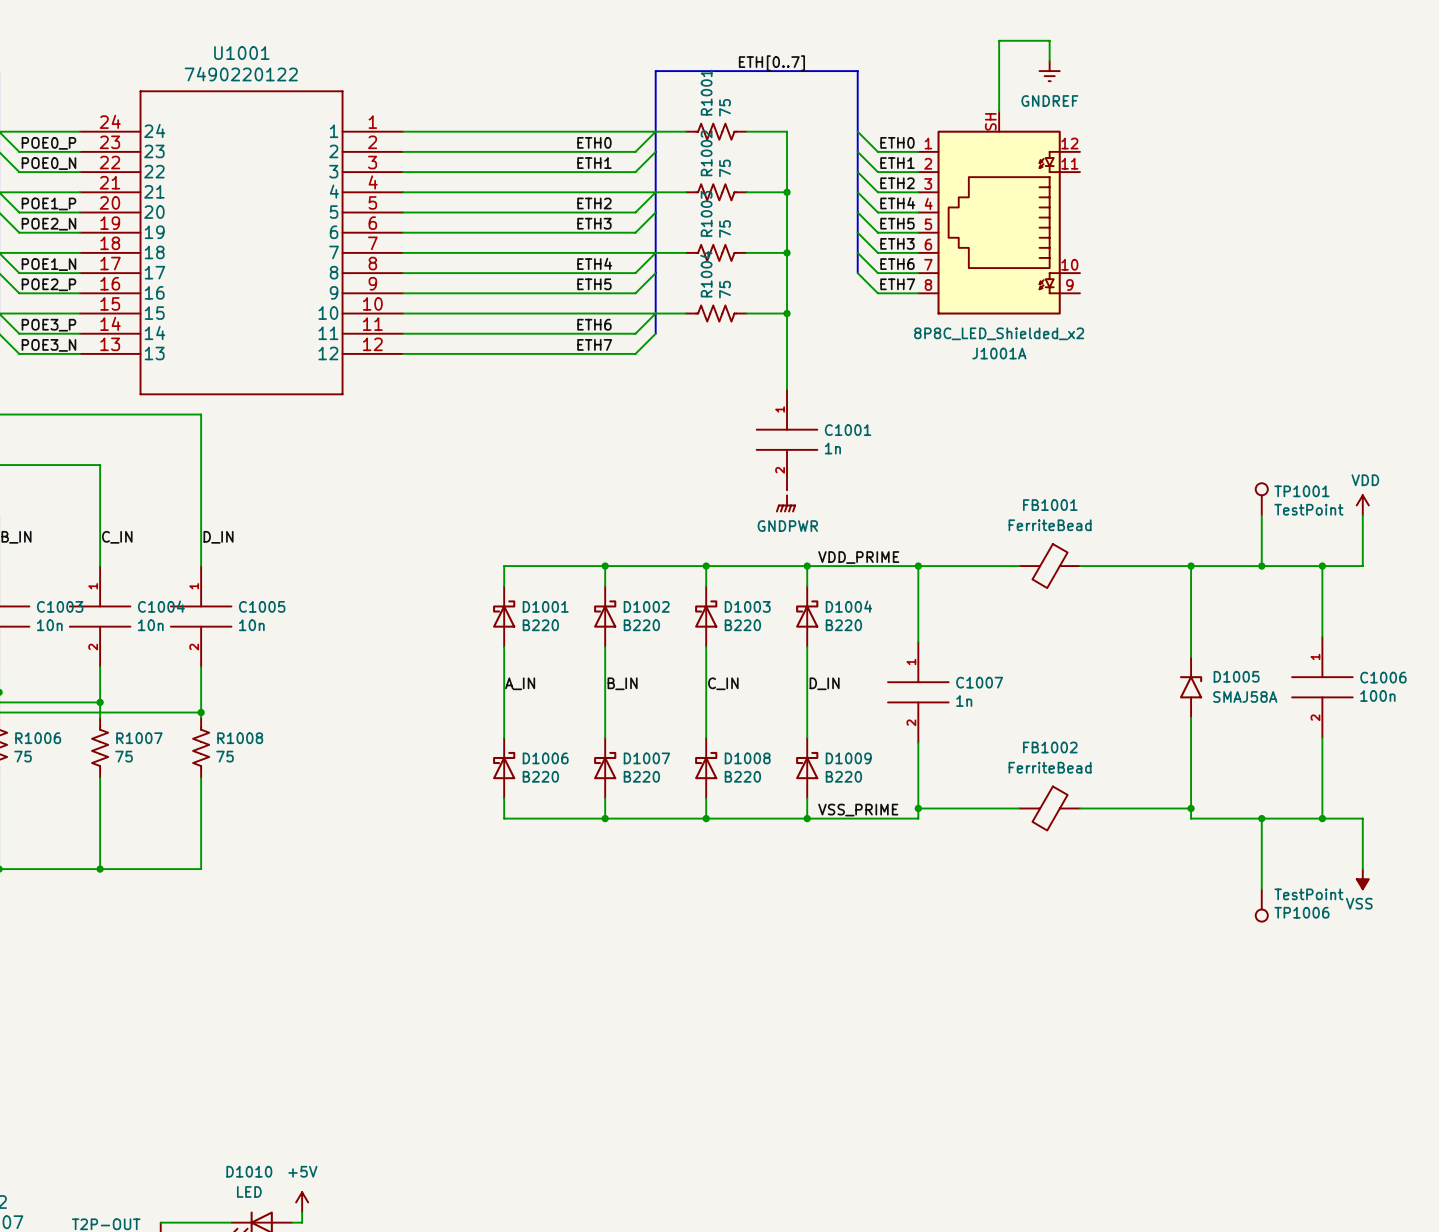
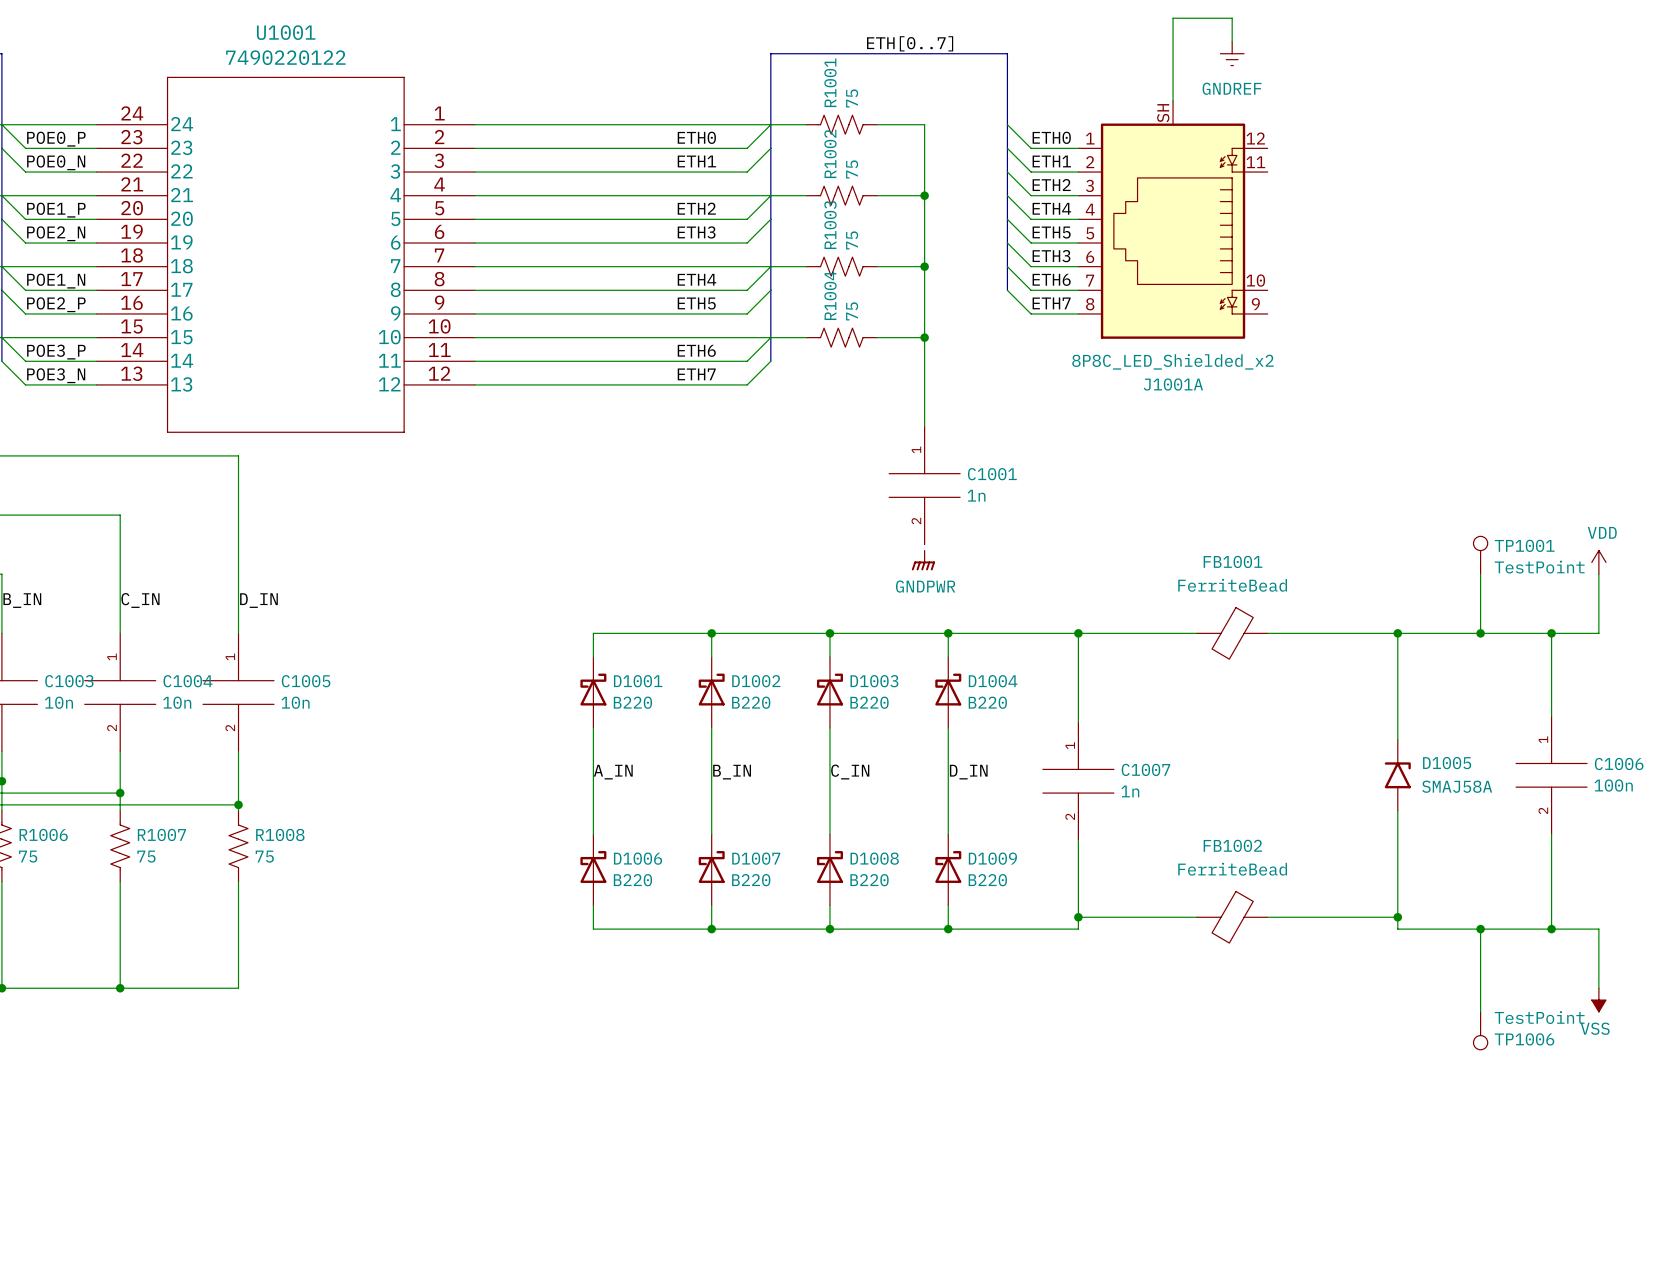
label: VDD_PRIME (858, 557) -> none
label: VSS_PRIME (858, 810) -> none

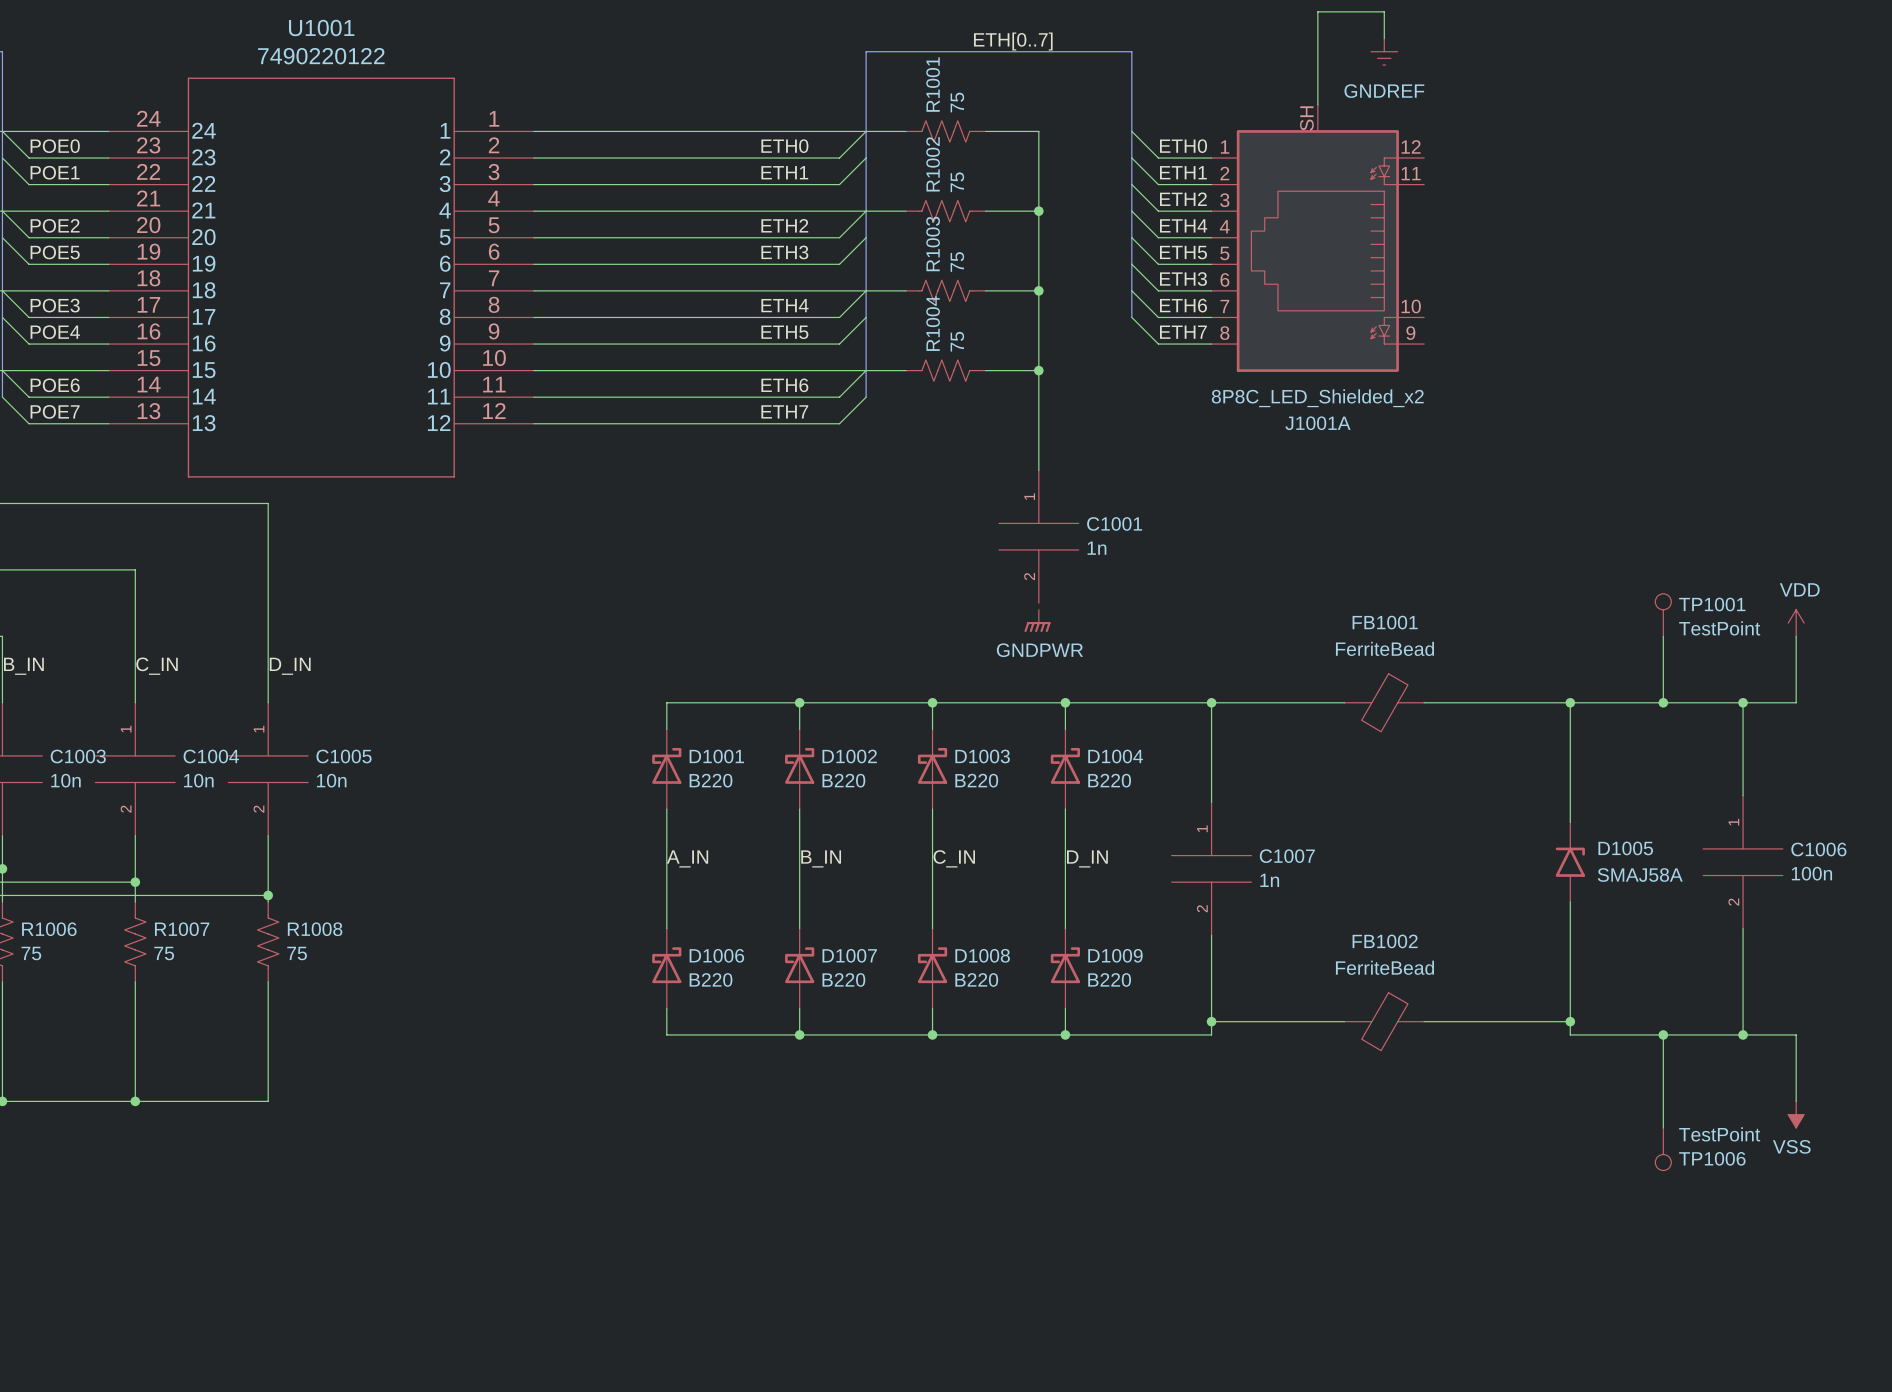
label: POE0_P (56, 139) -> POE0 (55, 146)
label: POE0_N (56, 162) -> POE1 (55, 172)
label: POE1_P (56, 210) -> POE2 (55, 225)
label: POE2_N (56, 233) -> POE5 (55, 252)
label: POE1_N (56, 281) -> POE3 (55, 305)
label: POE2_P (56, 304) -> POE4 (55, 332)
label: POE3_P (56, 352) -> POE6 (55, 385)
label: POE3_N (56, 375) -> POE7 (55, 411)

